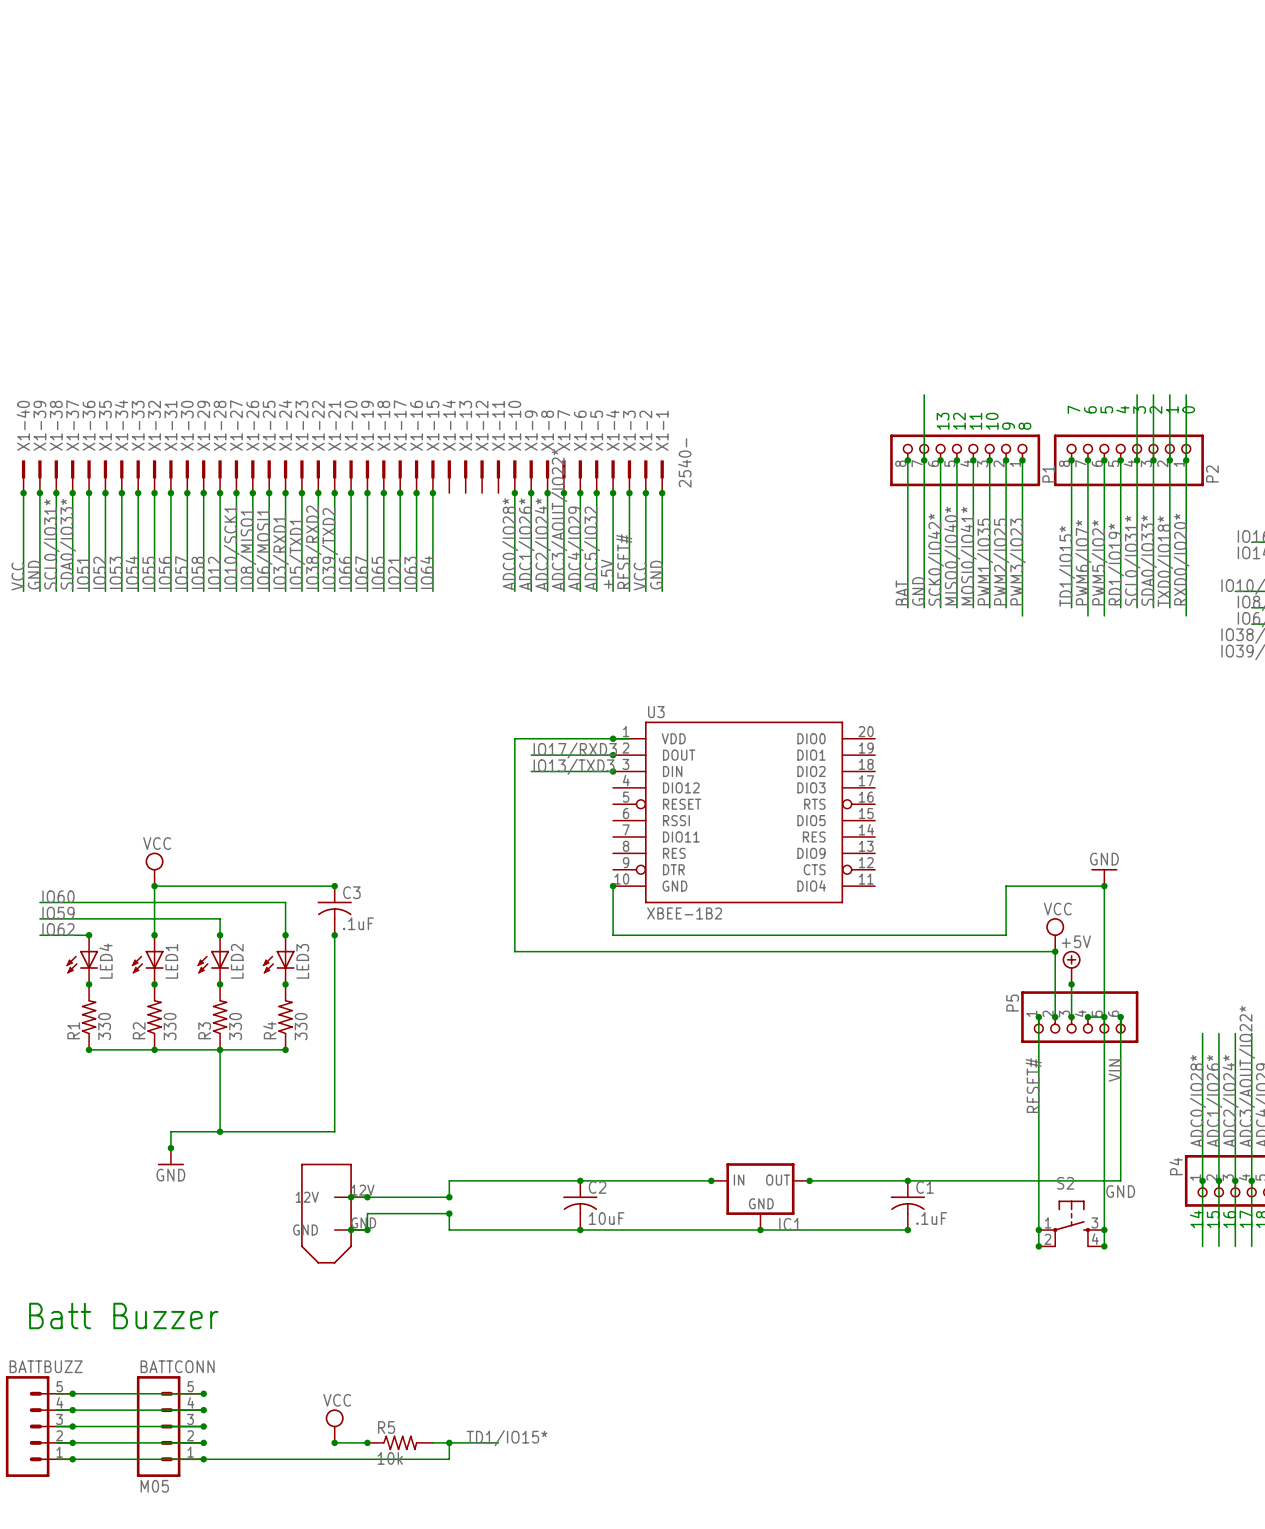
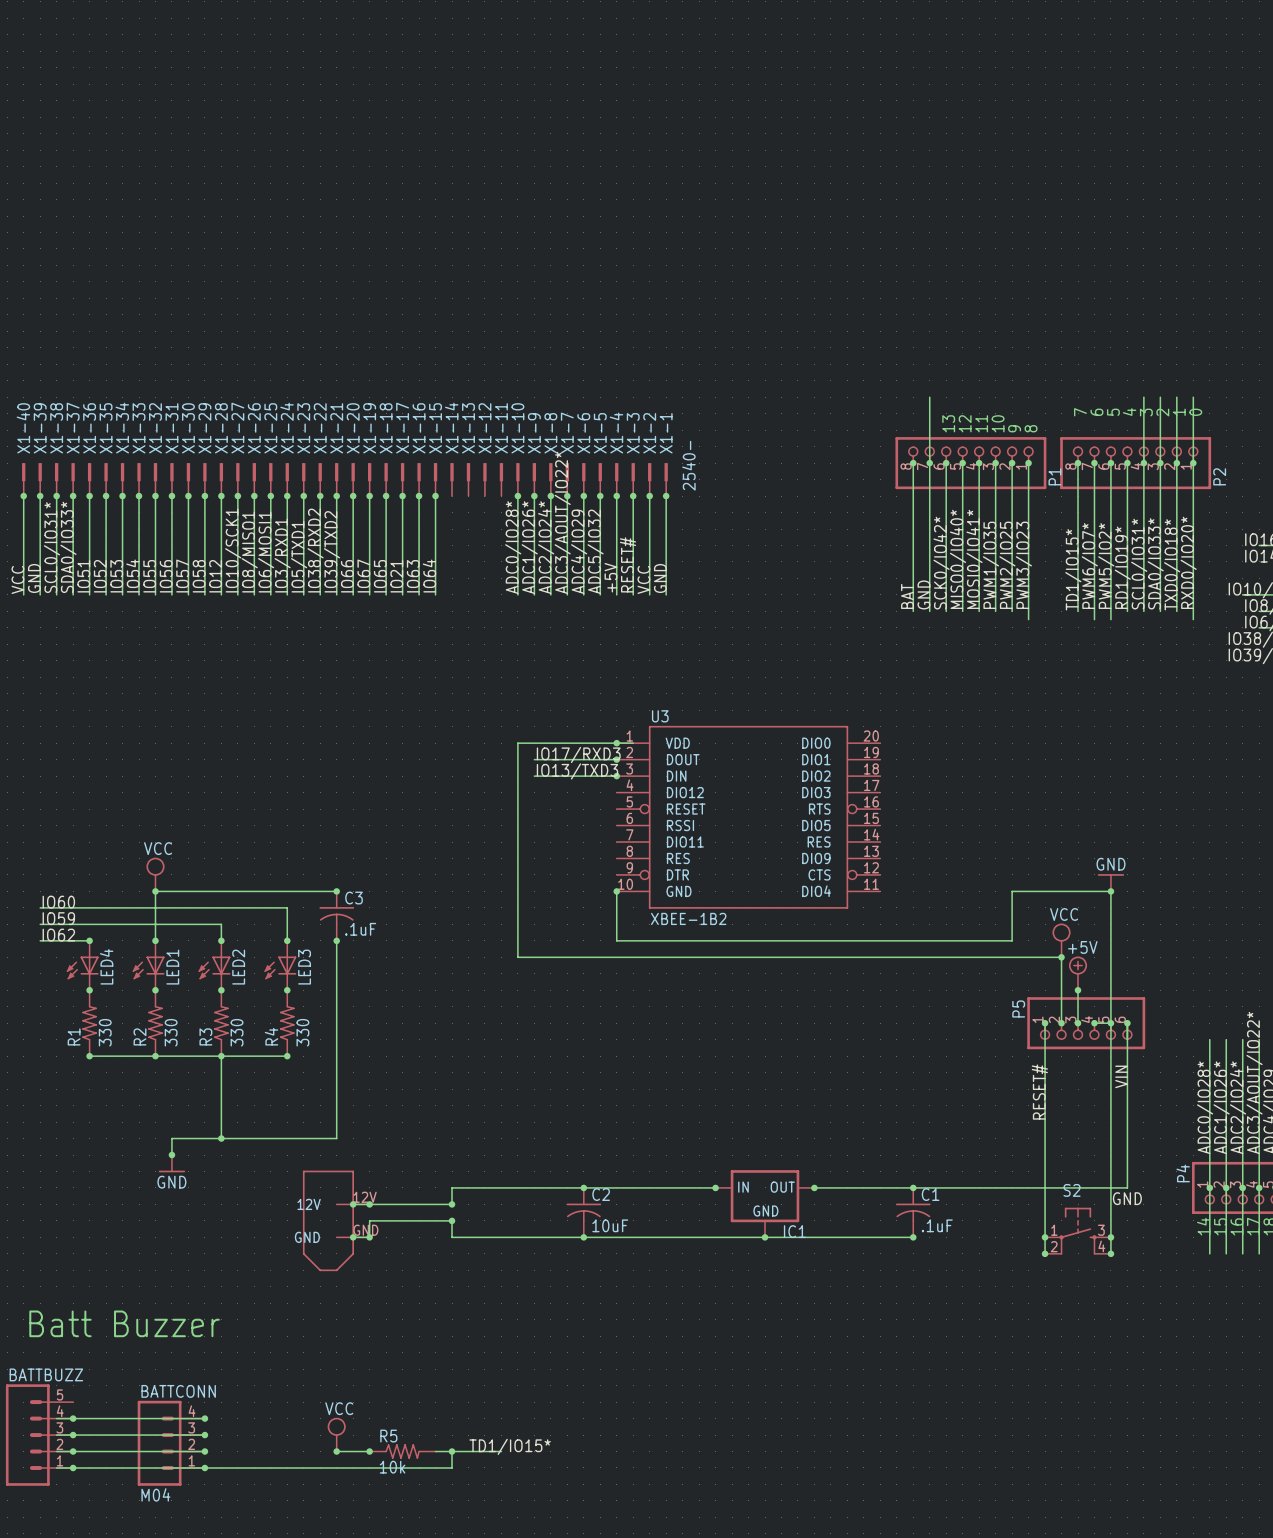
wire: (56, 1393) (203, 1393) -> none
junction: (72, 1393) -> none
junction: (203, 1393) -> none
BATTCONN: M05 (170, 1426) -> none
BATTCONN: none -> M04 (171, 1443)

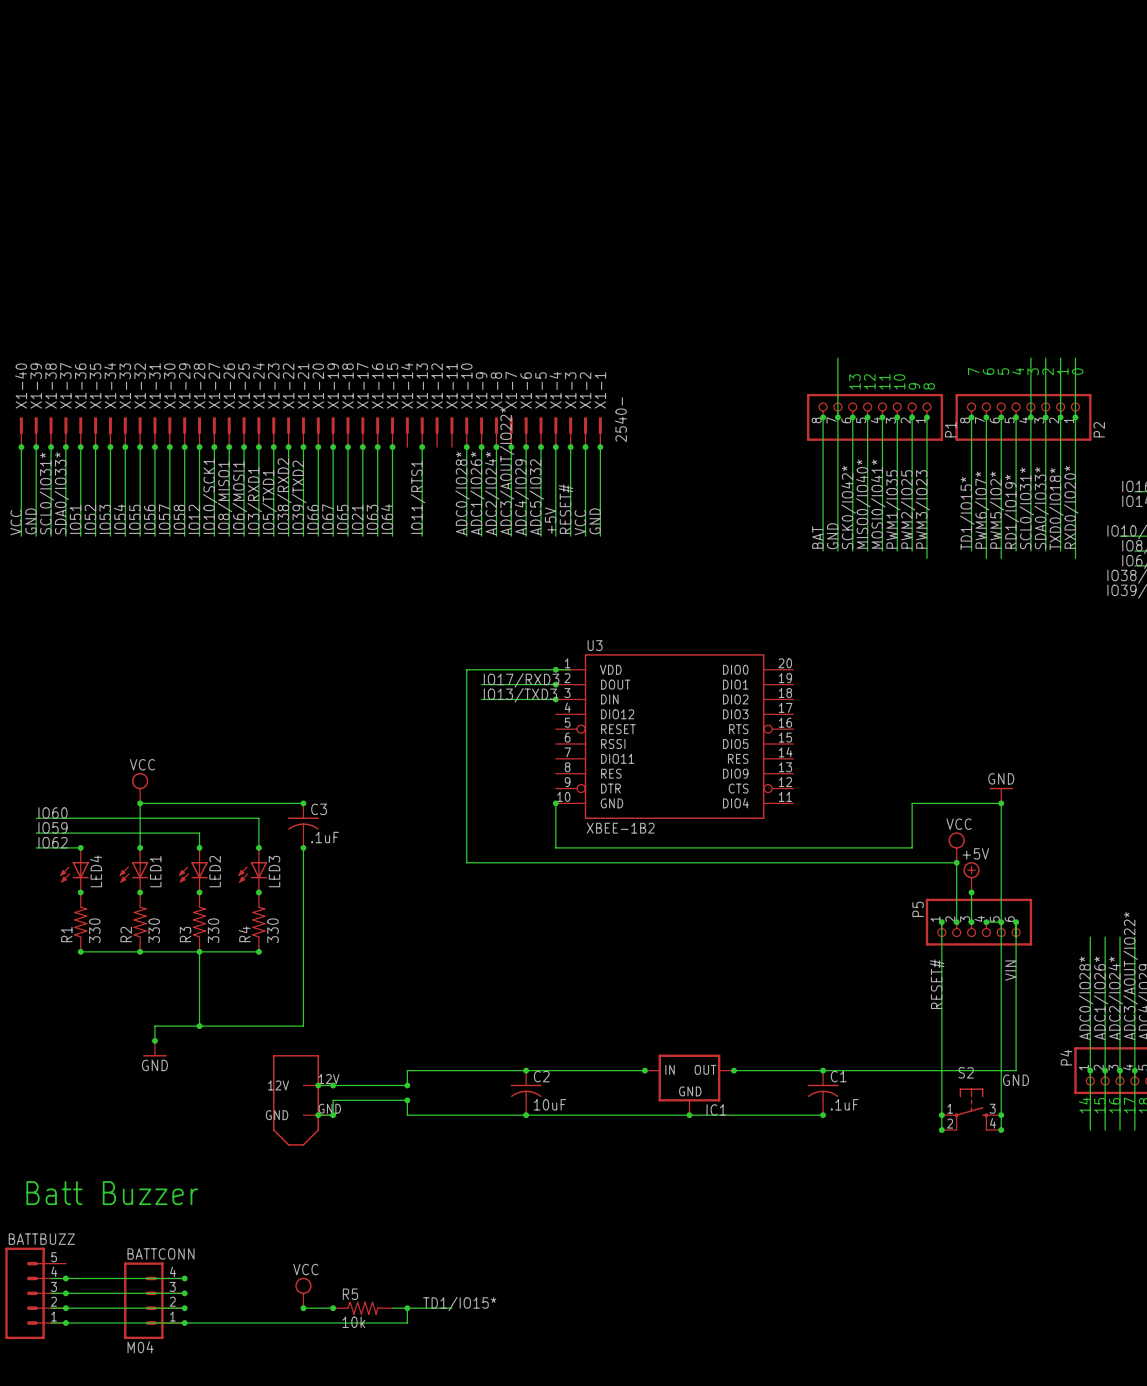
wire: none -> (422, 447) (422, 536)
junction: none -> (422, 447)
label: none -> IO11/RTS1 (418, 497)

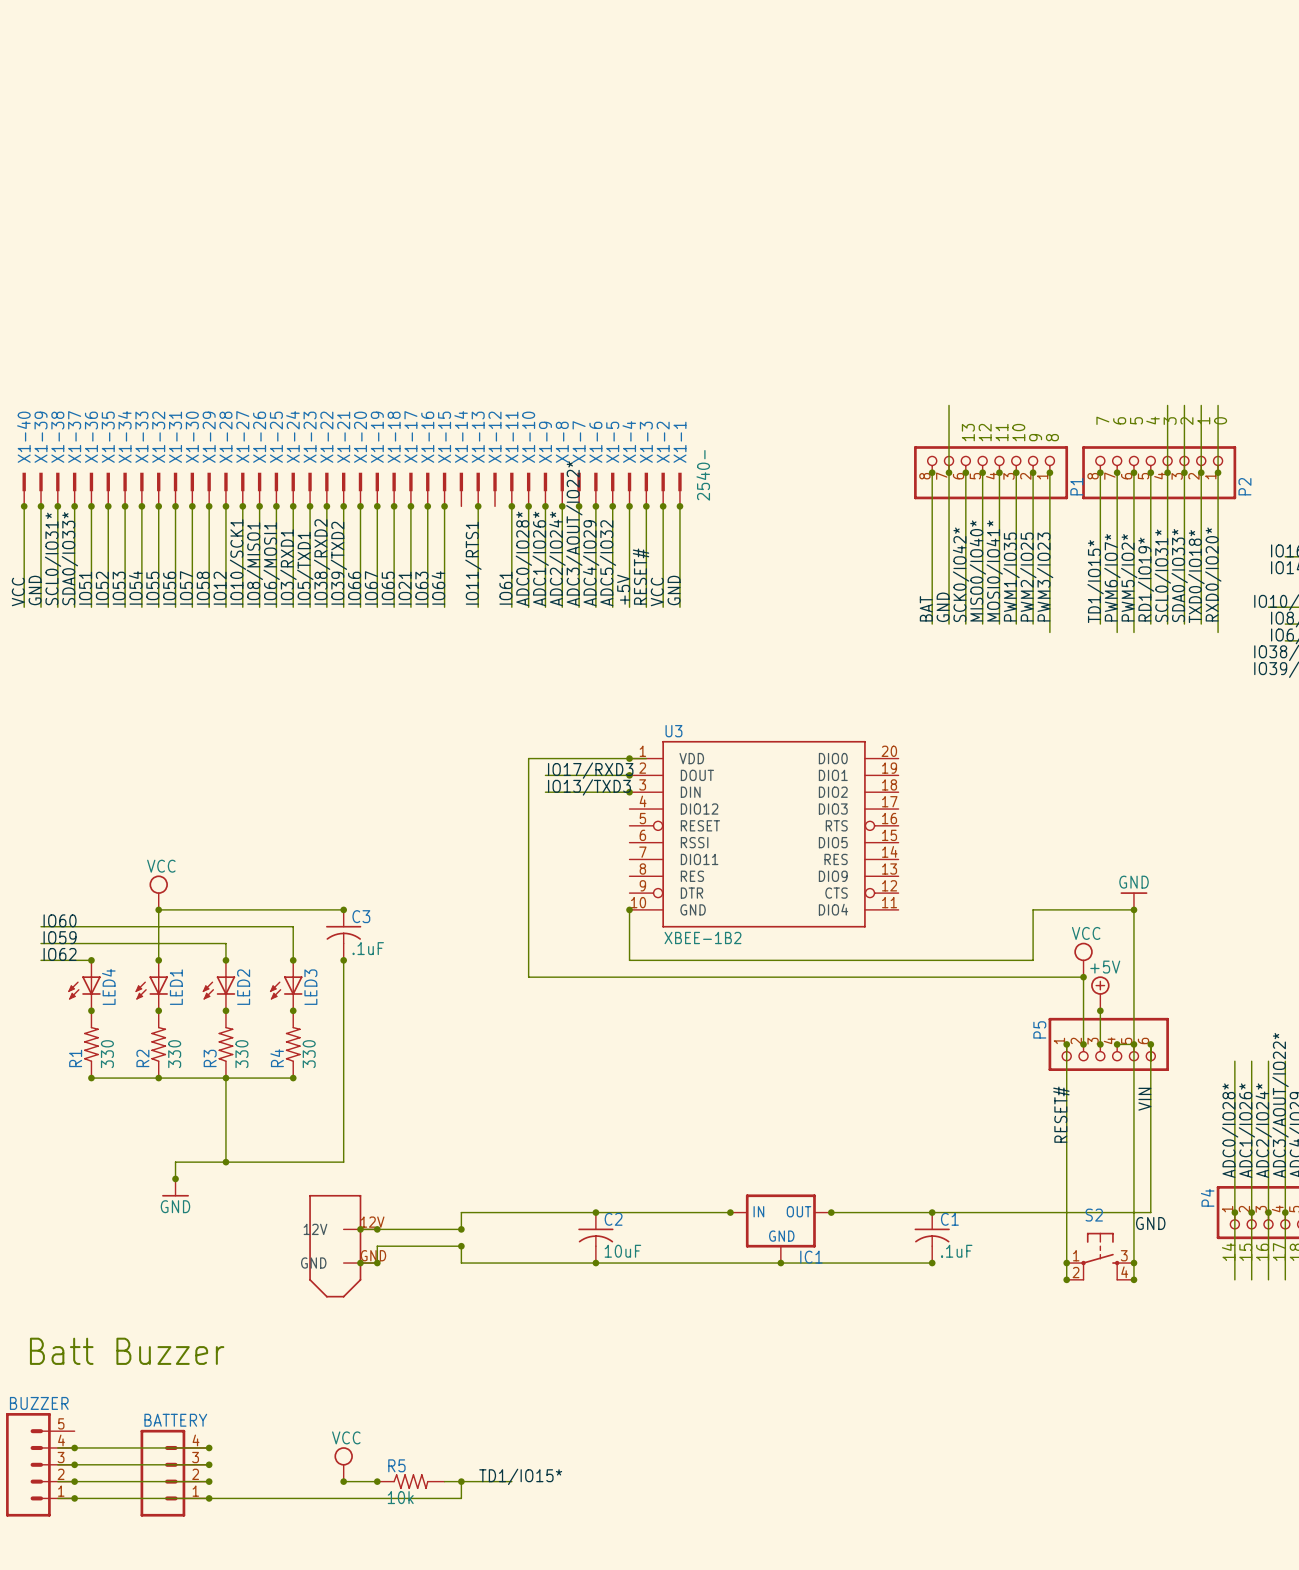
wire: none -> (511, 506) (511, 607)
junction: none -> (511, 506)
label: none -> IO61 (505, 588)
BATTBUZZ name: BATTBUZZ (41, 1239) -> BUZZER (39, 1403)
BATTCONN name: BATTCONN (161, 1253) -> BATTERY (175, 1420)
BATTCONN value: M04 (140, 1347) -> none

